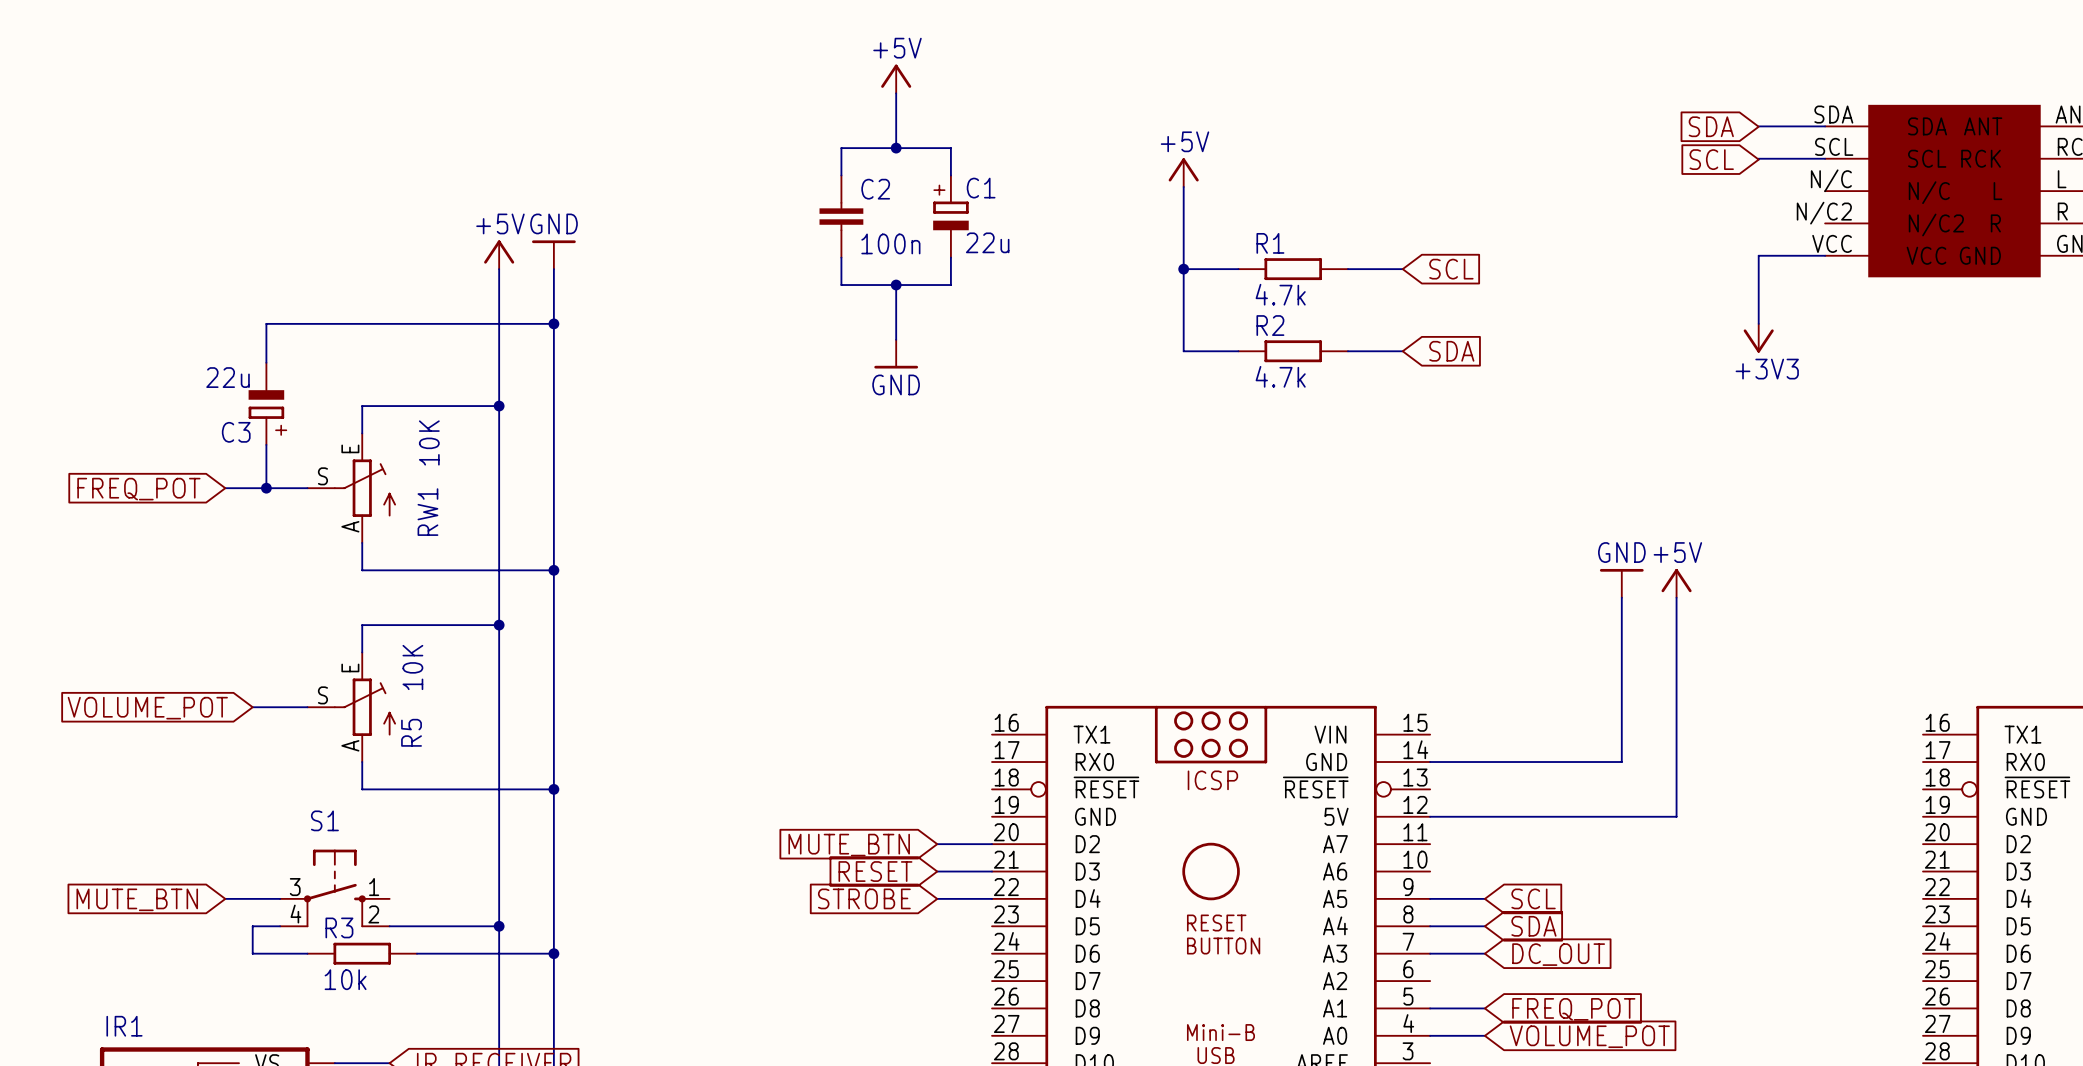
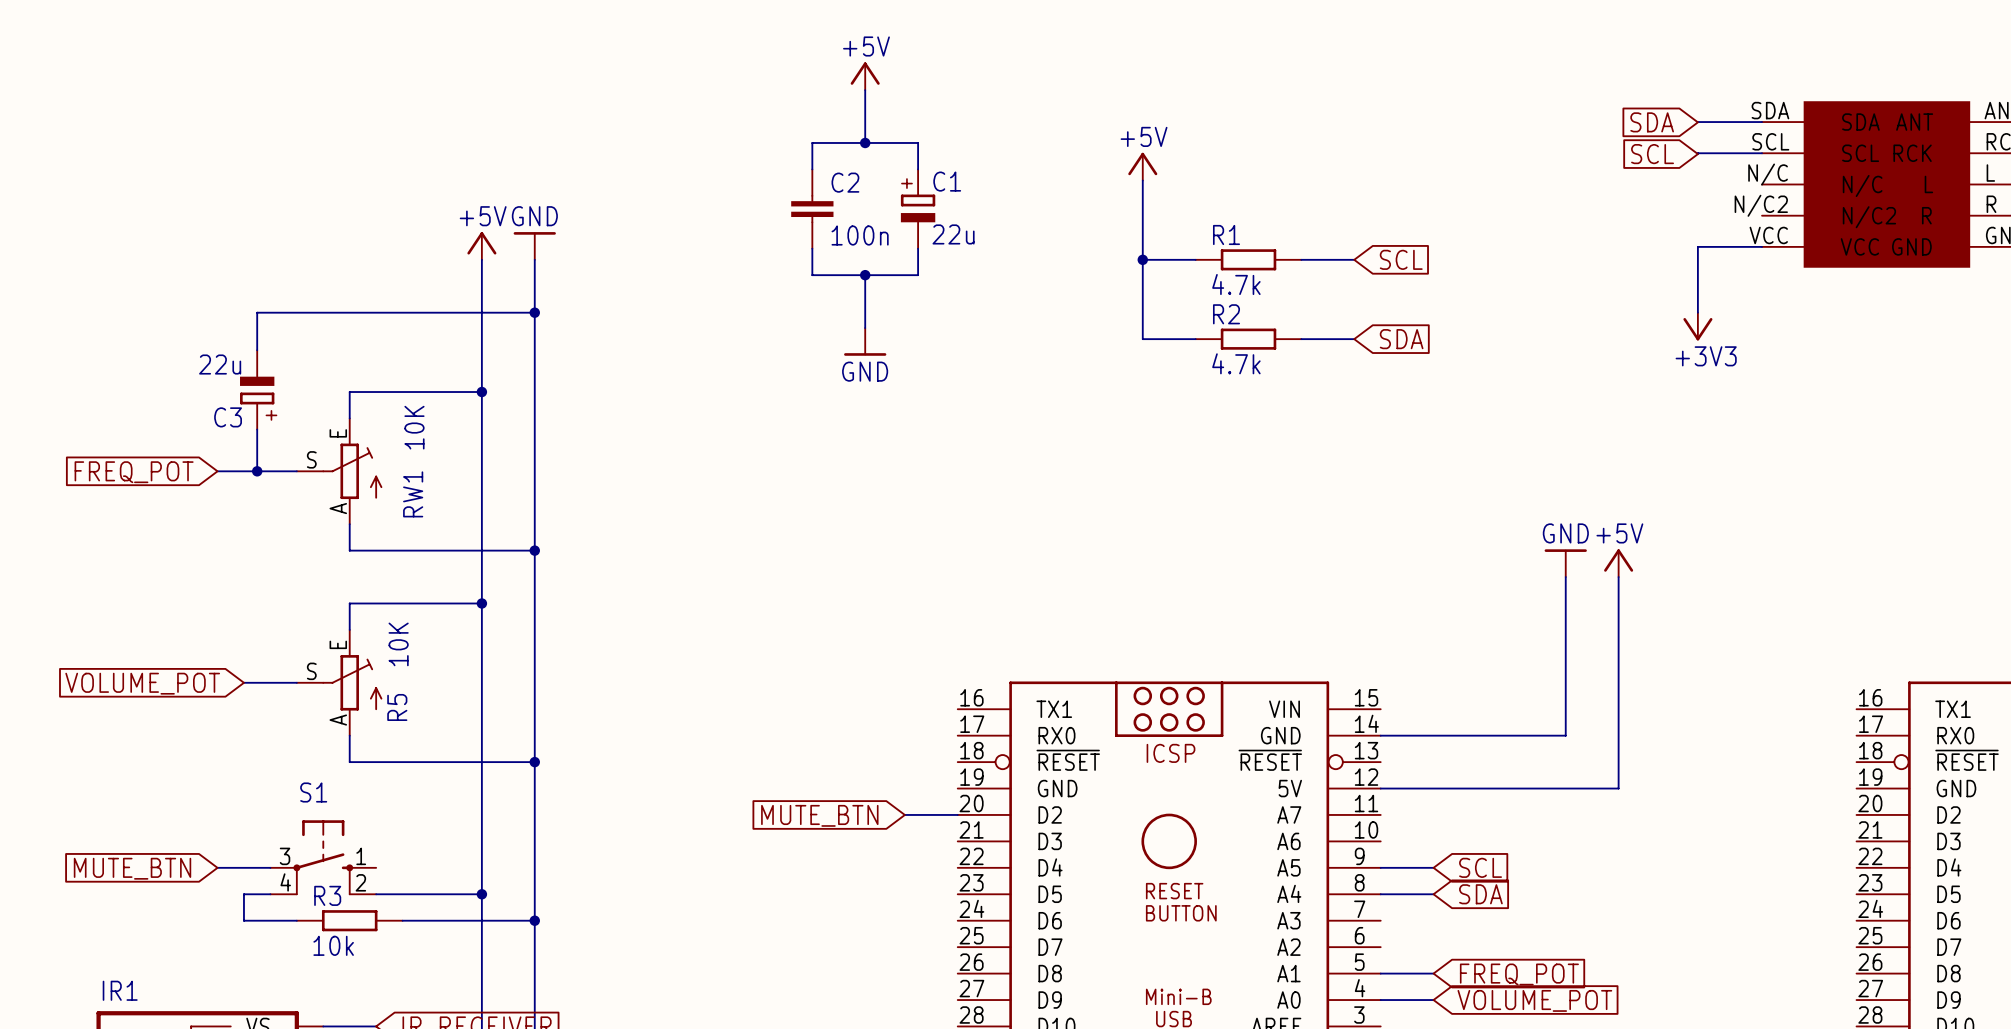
global label: RESET (875, 871) -> none
wire: (937, 871) (992, 871) -> none
global label: STROBE (864, 898) -> none
wire: (937, 898) (992, 898) -> none
wire: (1430, 953) (1484, 953) -> none
global label: DC_OUT (1558, 954) -> none

